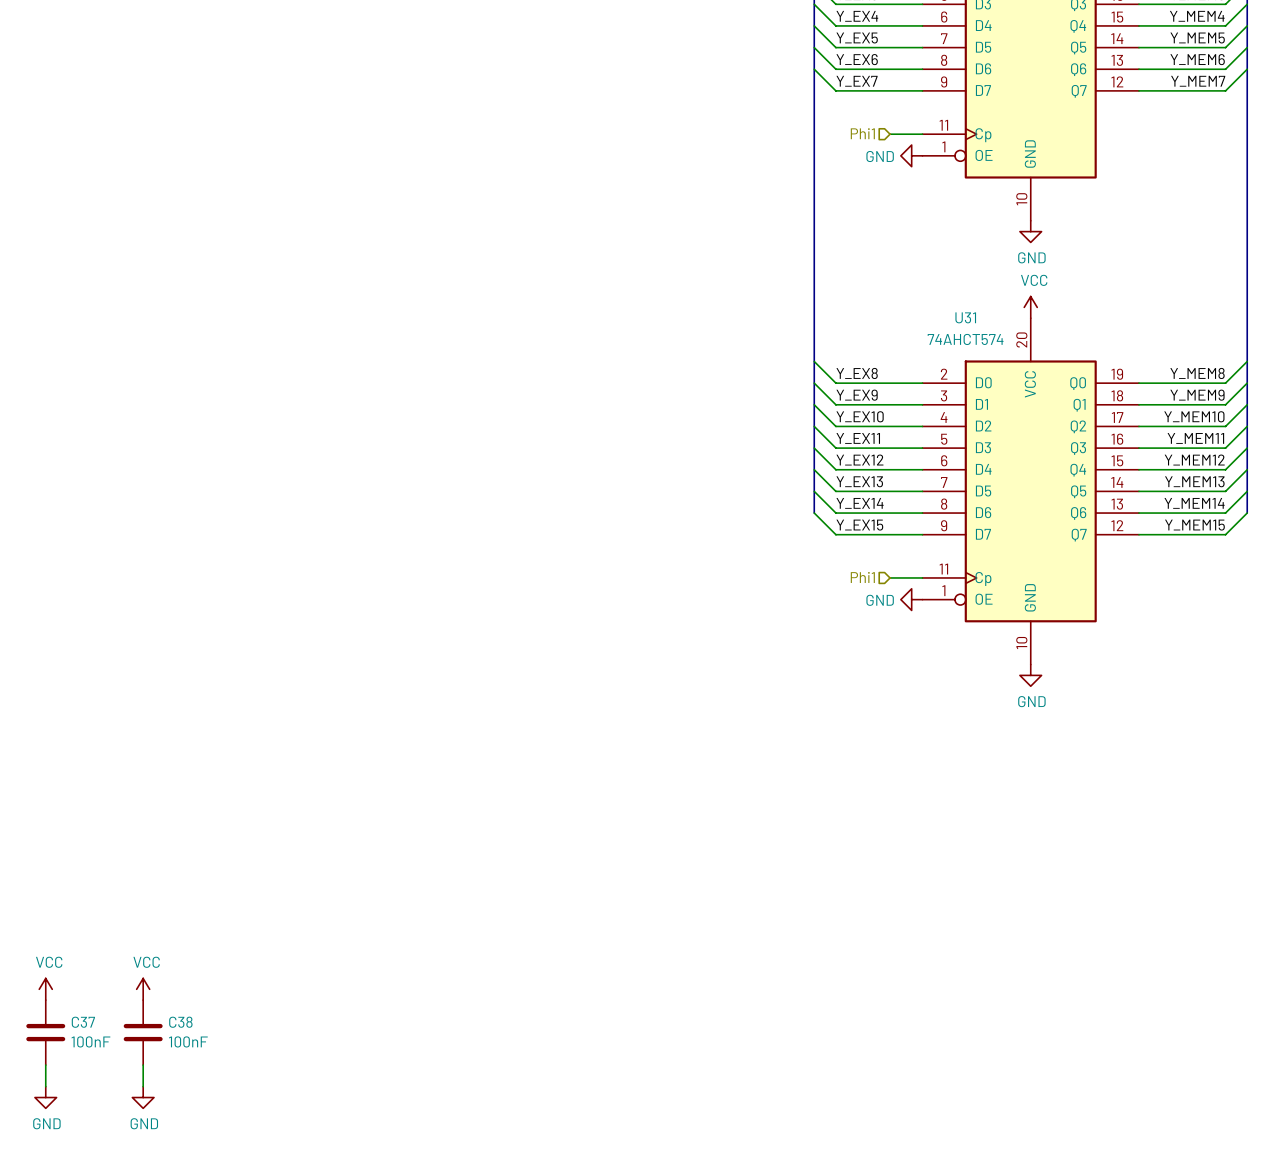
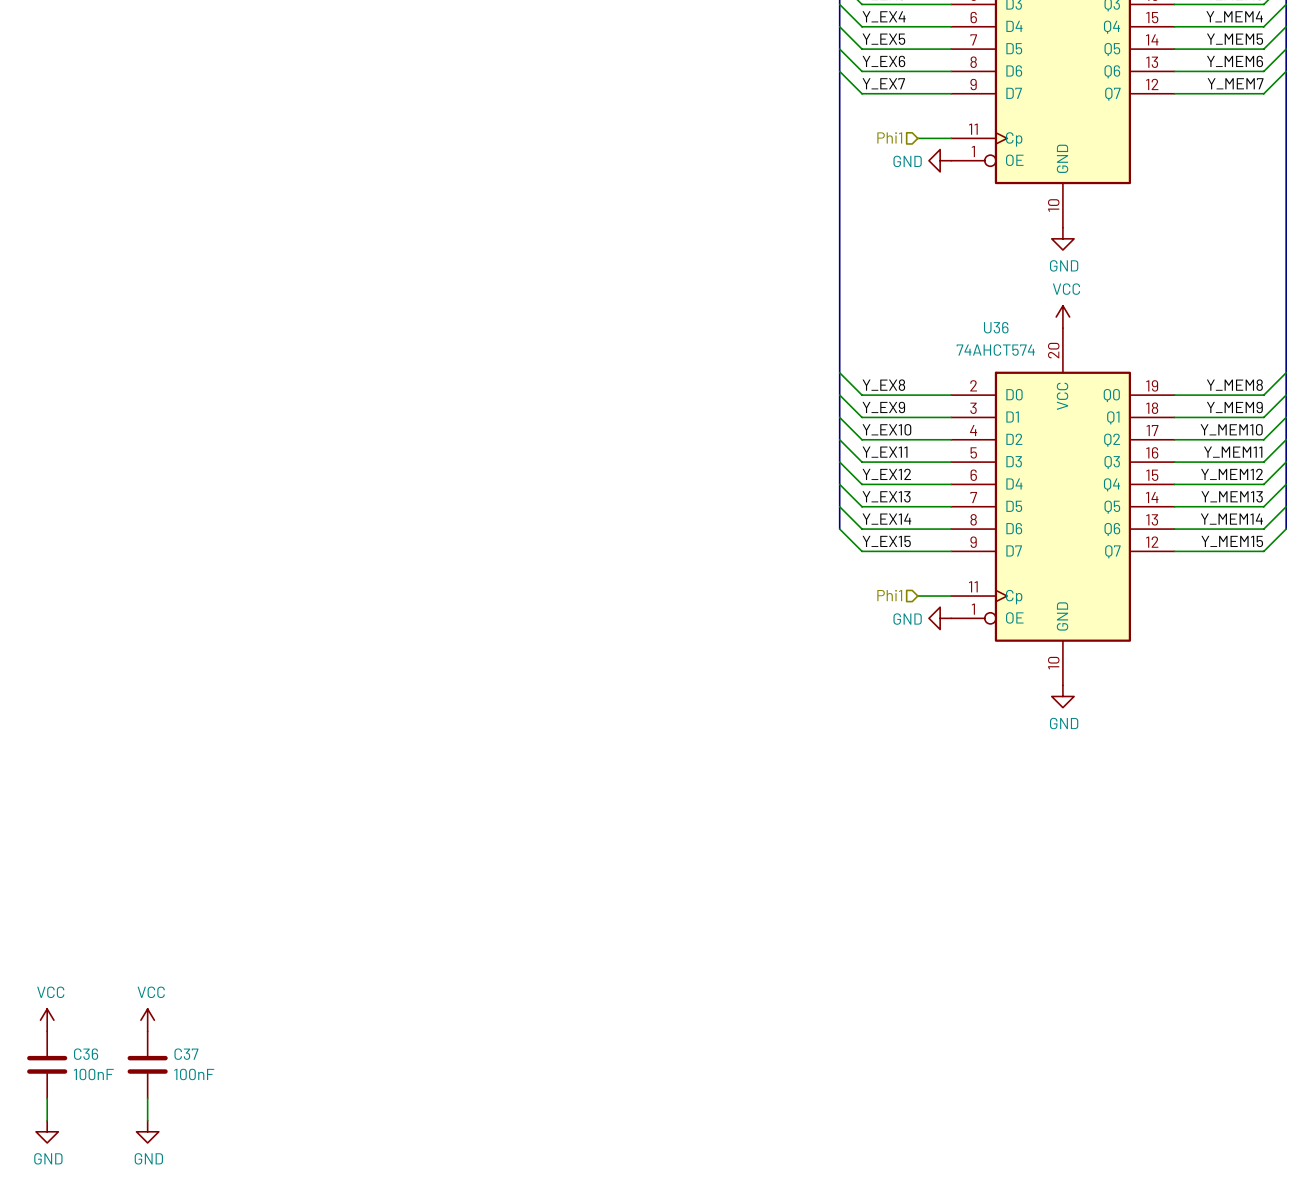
U31 name: U31 (965, 317) -> U36 (996, 327)
C37 name: C37 (83, 1022) -> C36 (86, 1054)
C38 name: C38 (180, 1022) -> C37 (186, 1054)

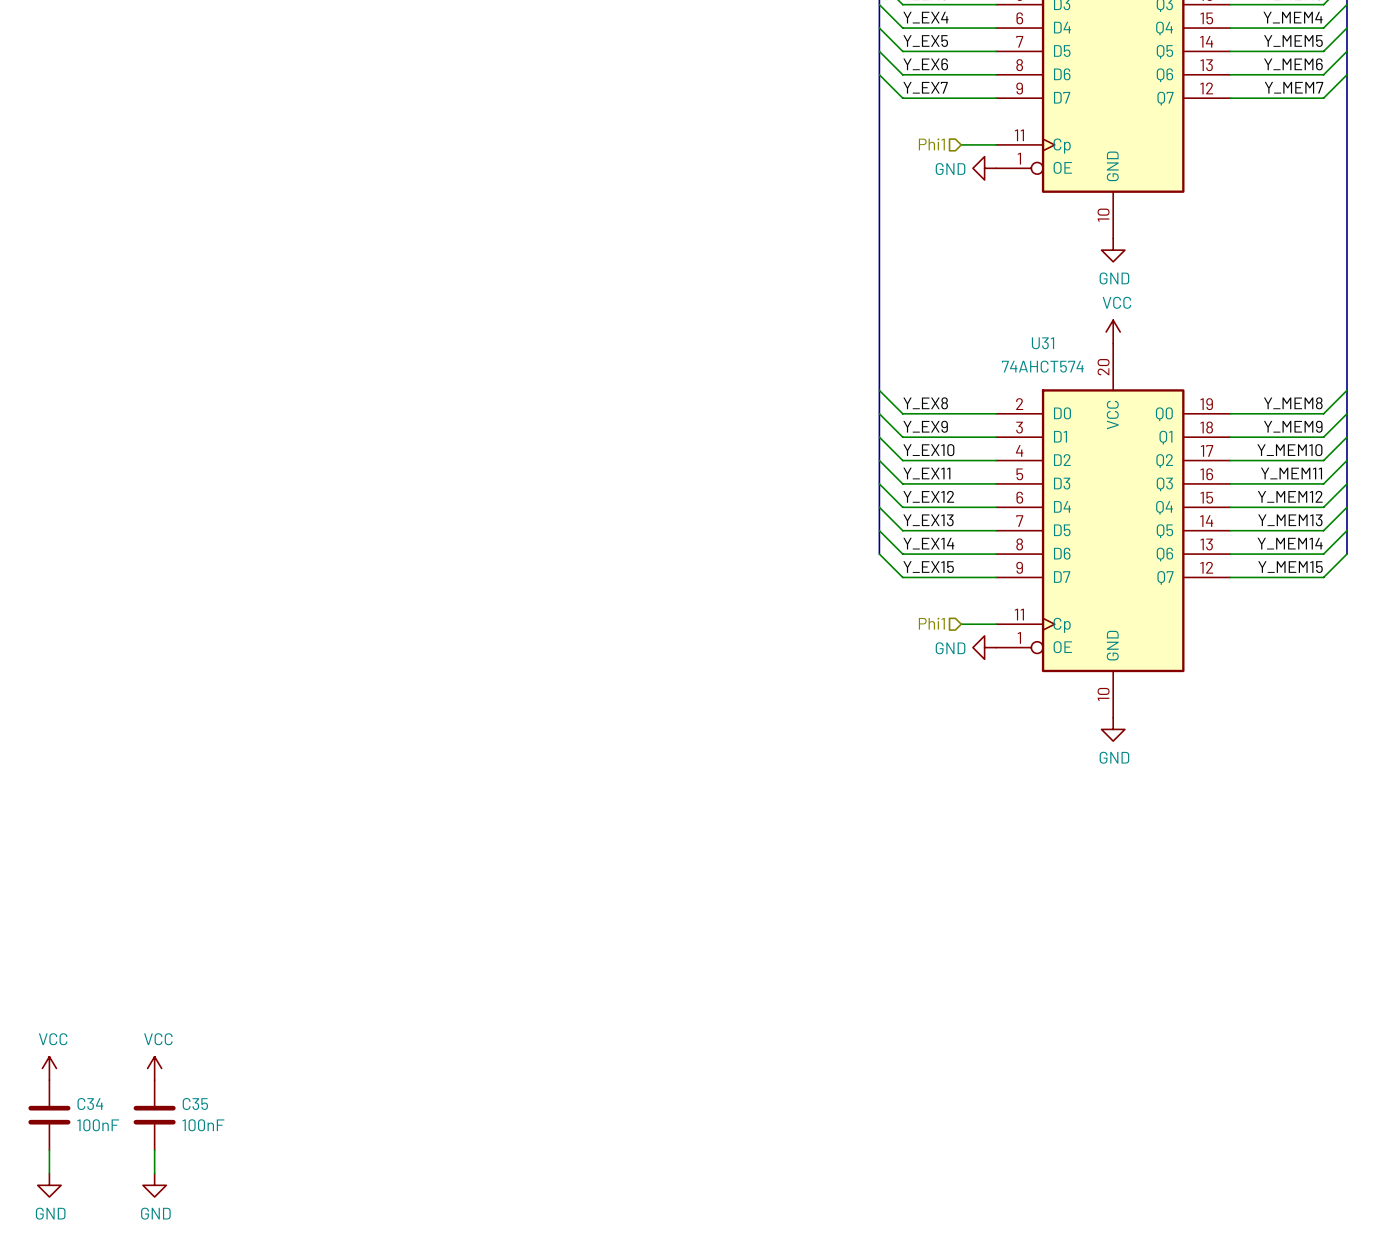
U36 name: U36 (996, 327) -> U31 (1042, 343)
C36 name: C36 (86, 1054) -> C34 (90, 1104)
C37 name: C37 (186, 1054) -> C35 (195, 1104)

